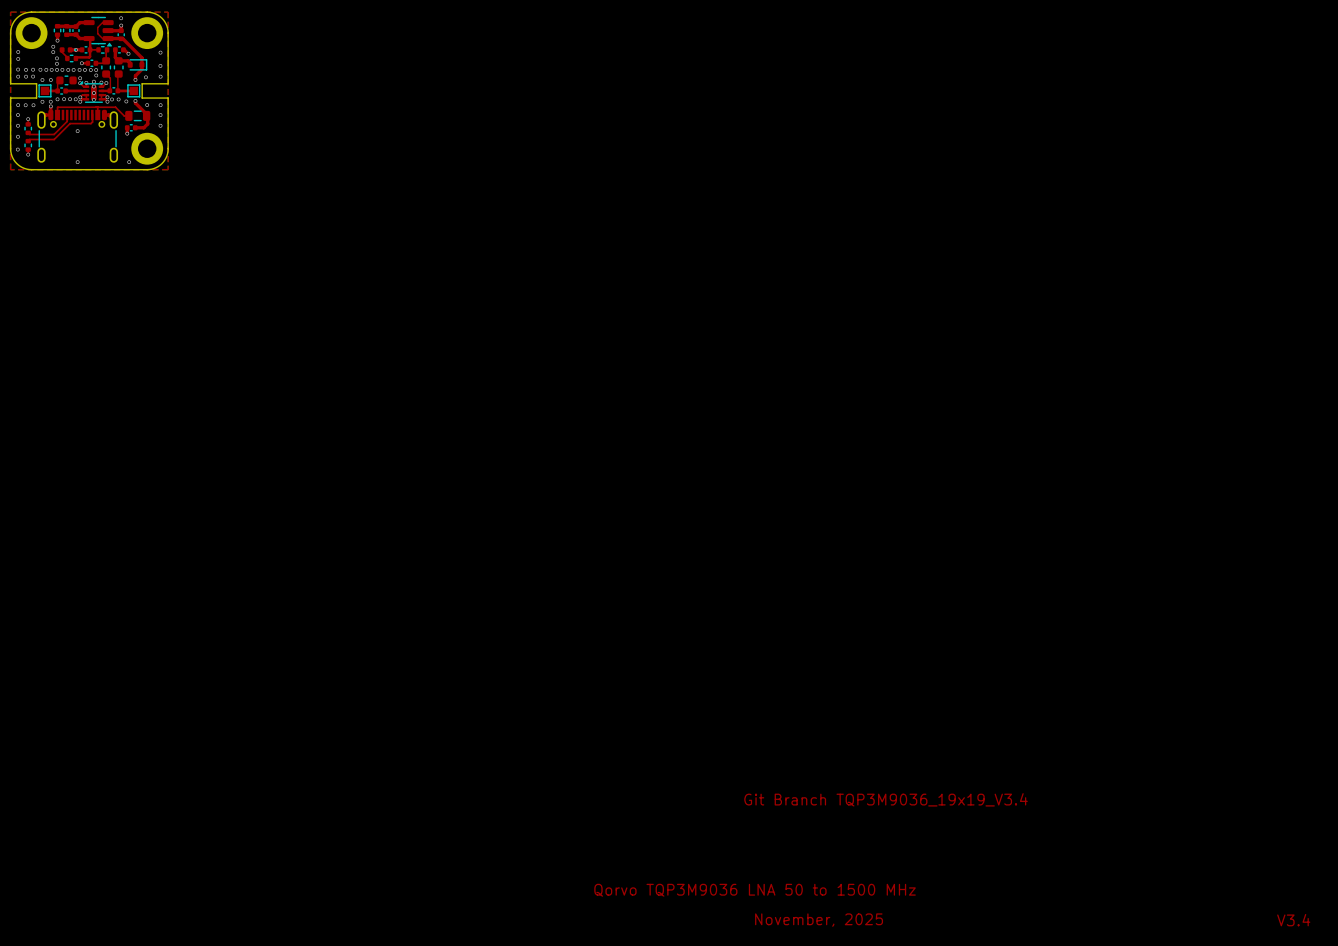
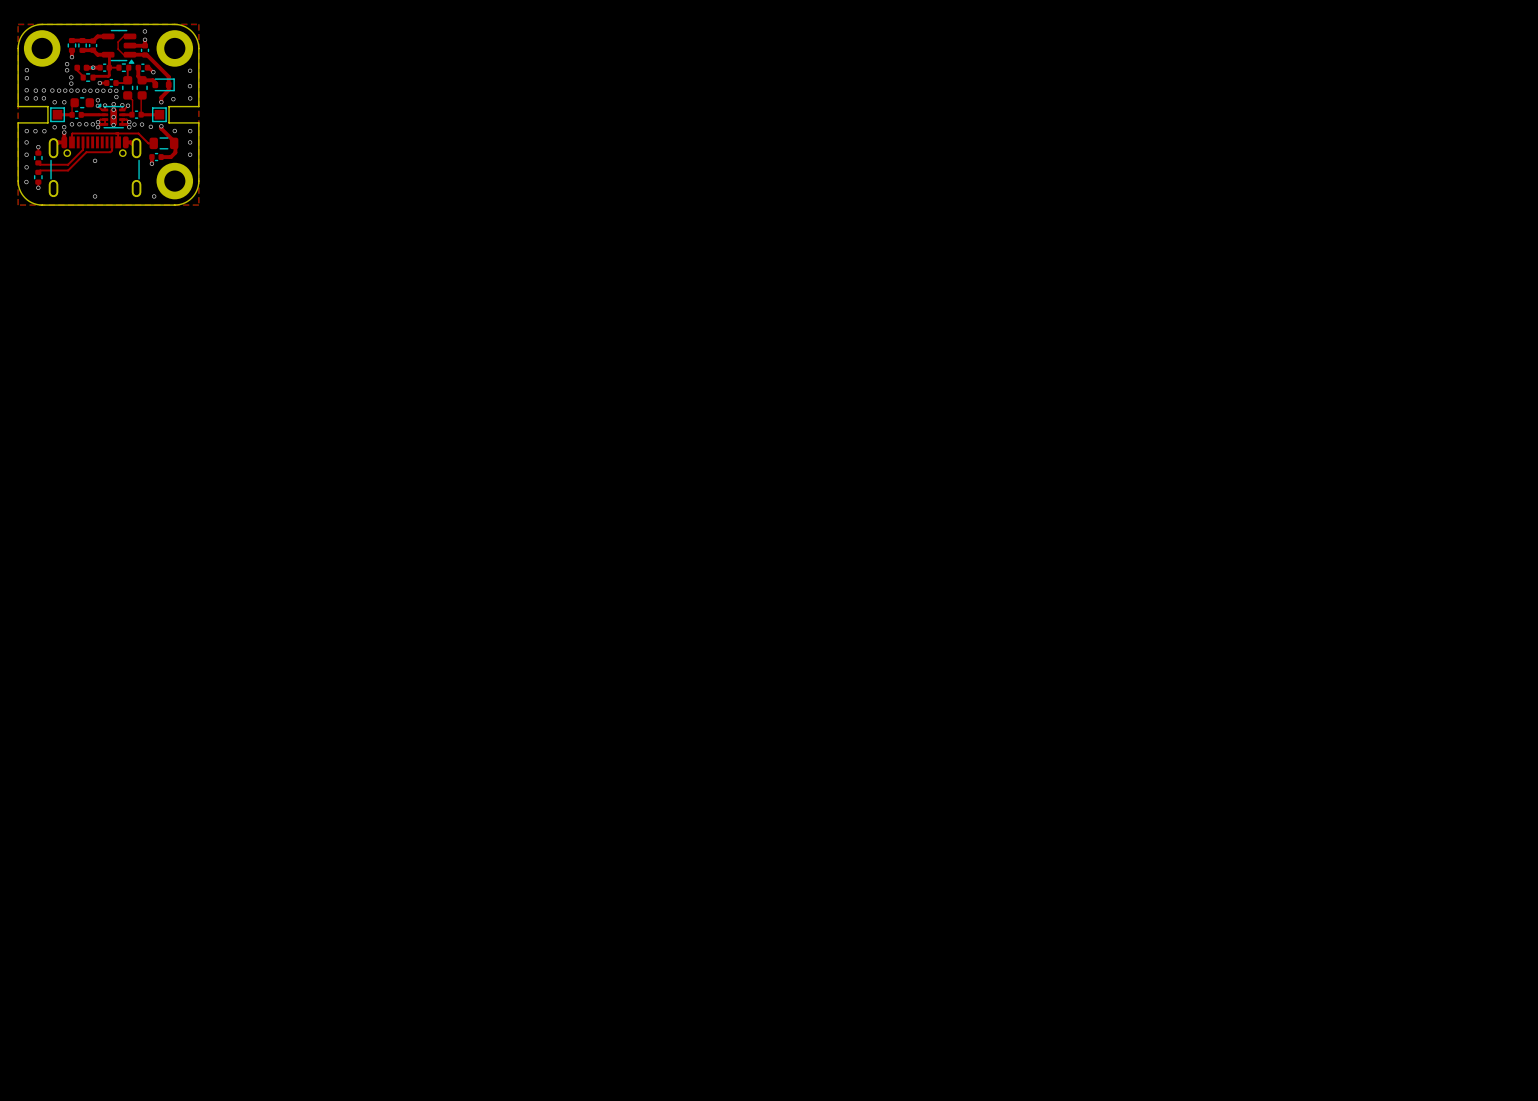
text: Git Branch TQP3M9036_19x19_V3.4 (886, 799) -> none
text: Qorvo TQP3M9036 LNA 50 to 1500 MHz (755, 890) -> none
text: November, 2025 (819, 920) -> none
text: V3.4 (1293, 920) -> none

